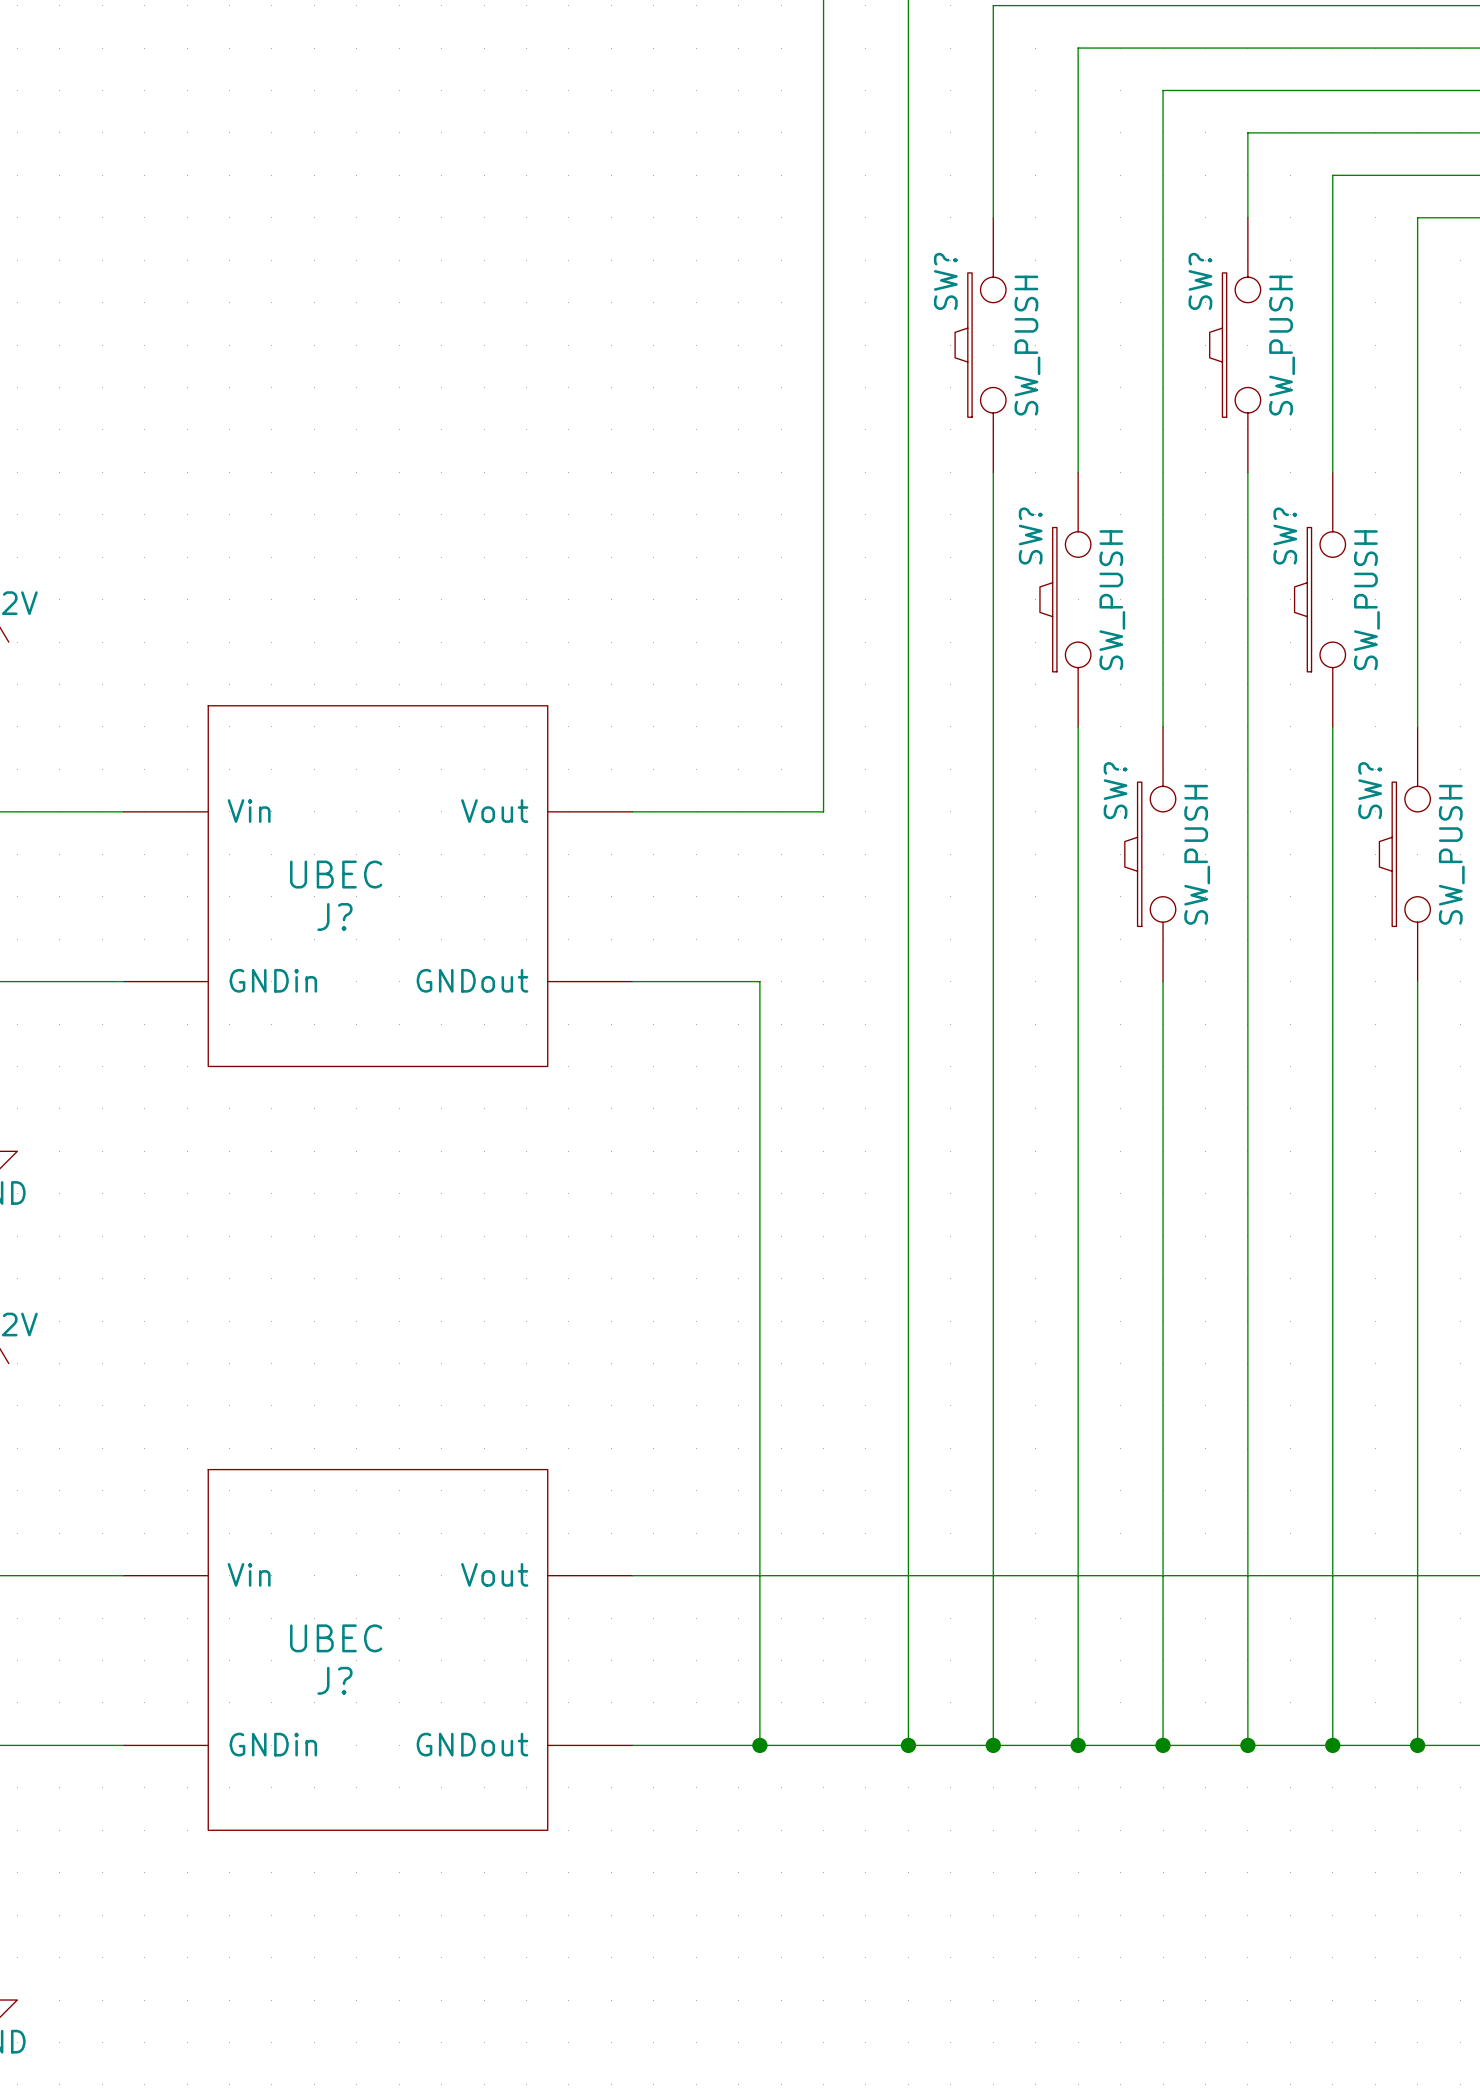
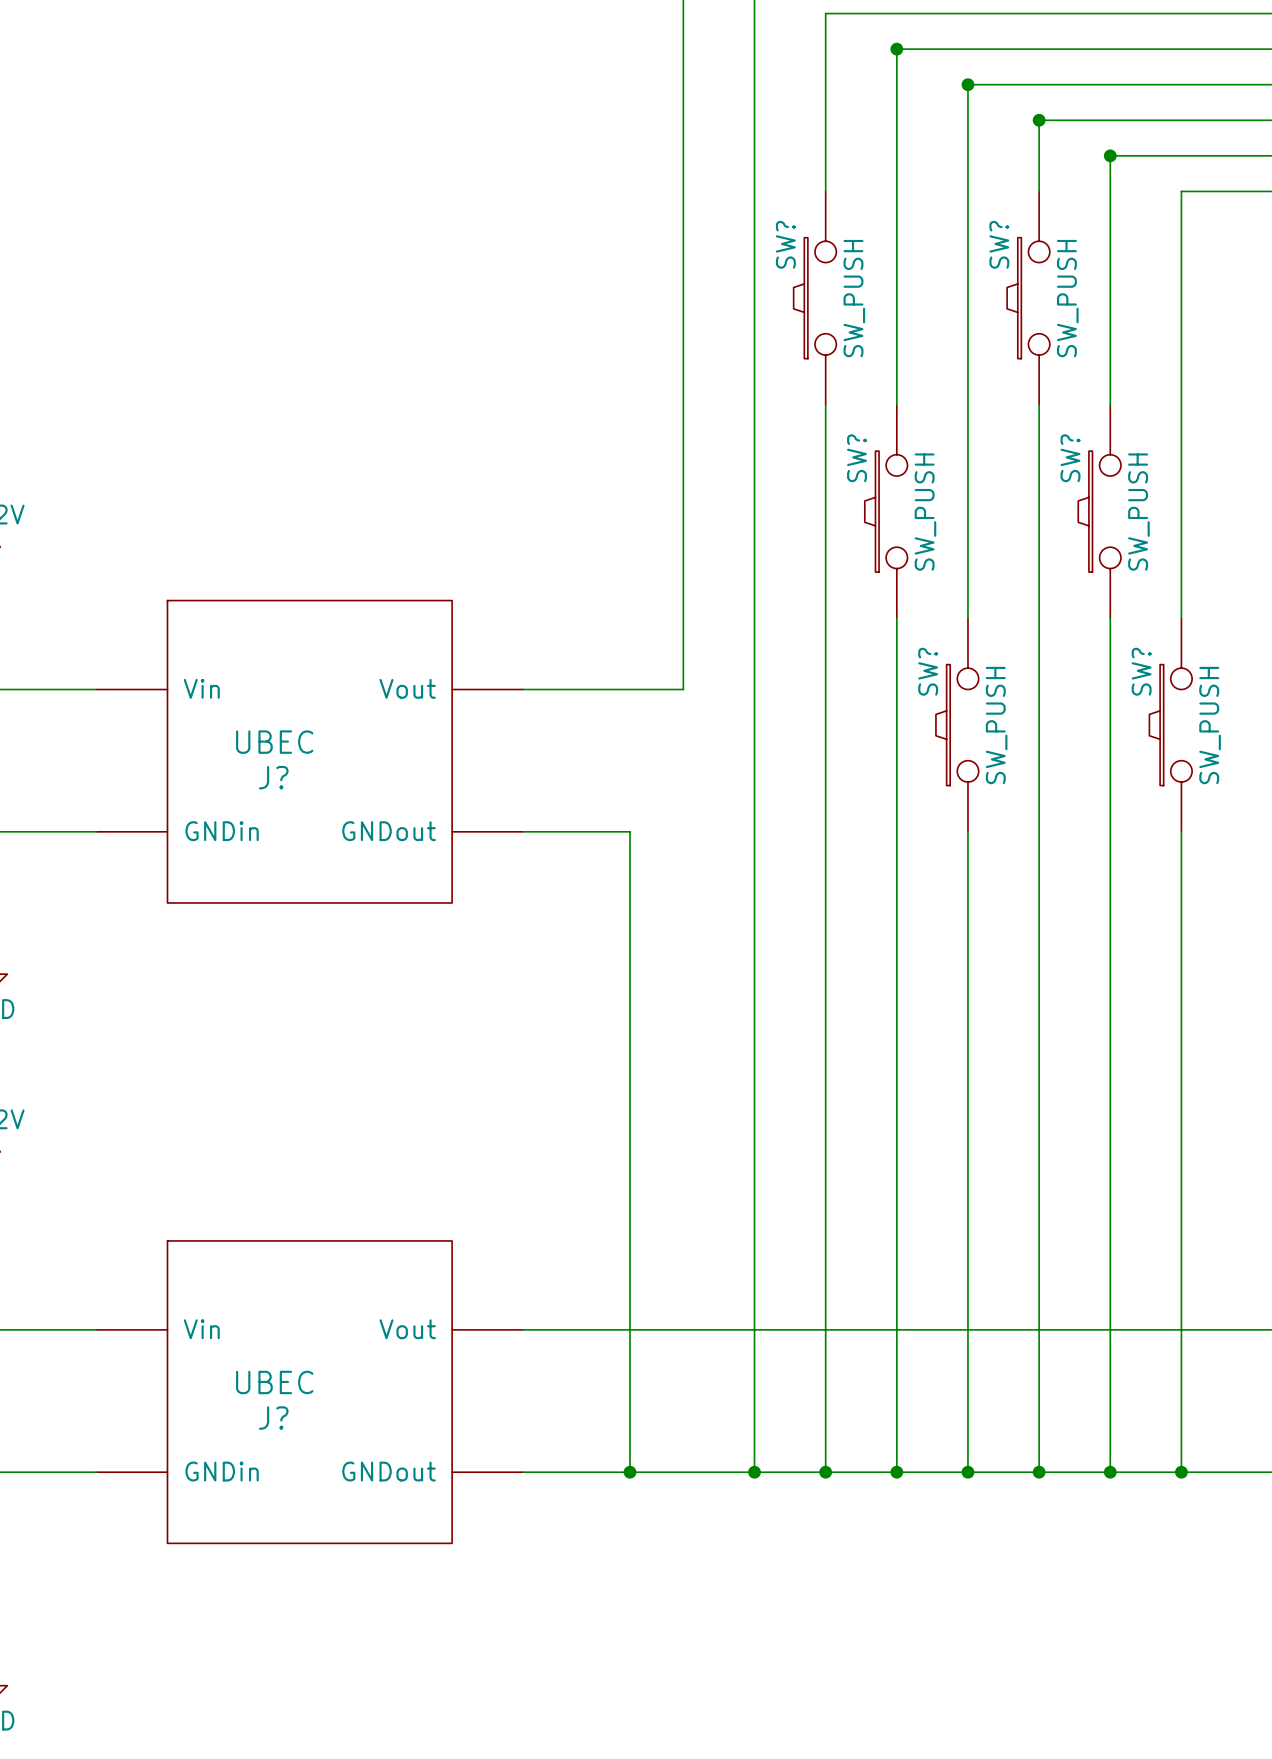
junction: none -> (896, 49)
junction: none -> (967, 84)
junction: none -> (1039, 120)
junction: none -> (1110, 155)

